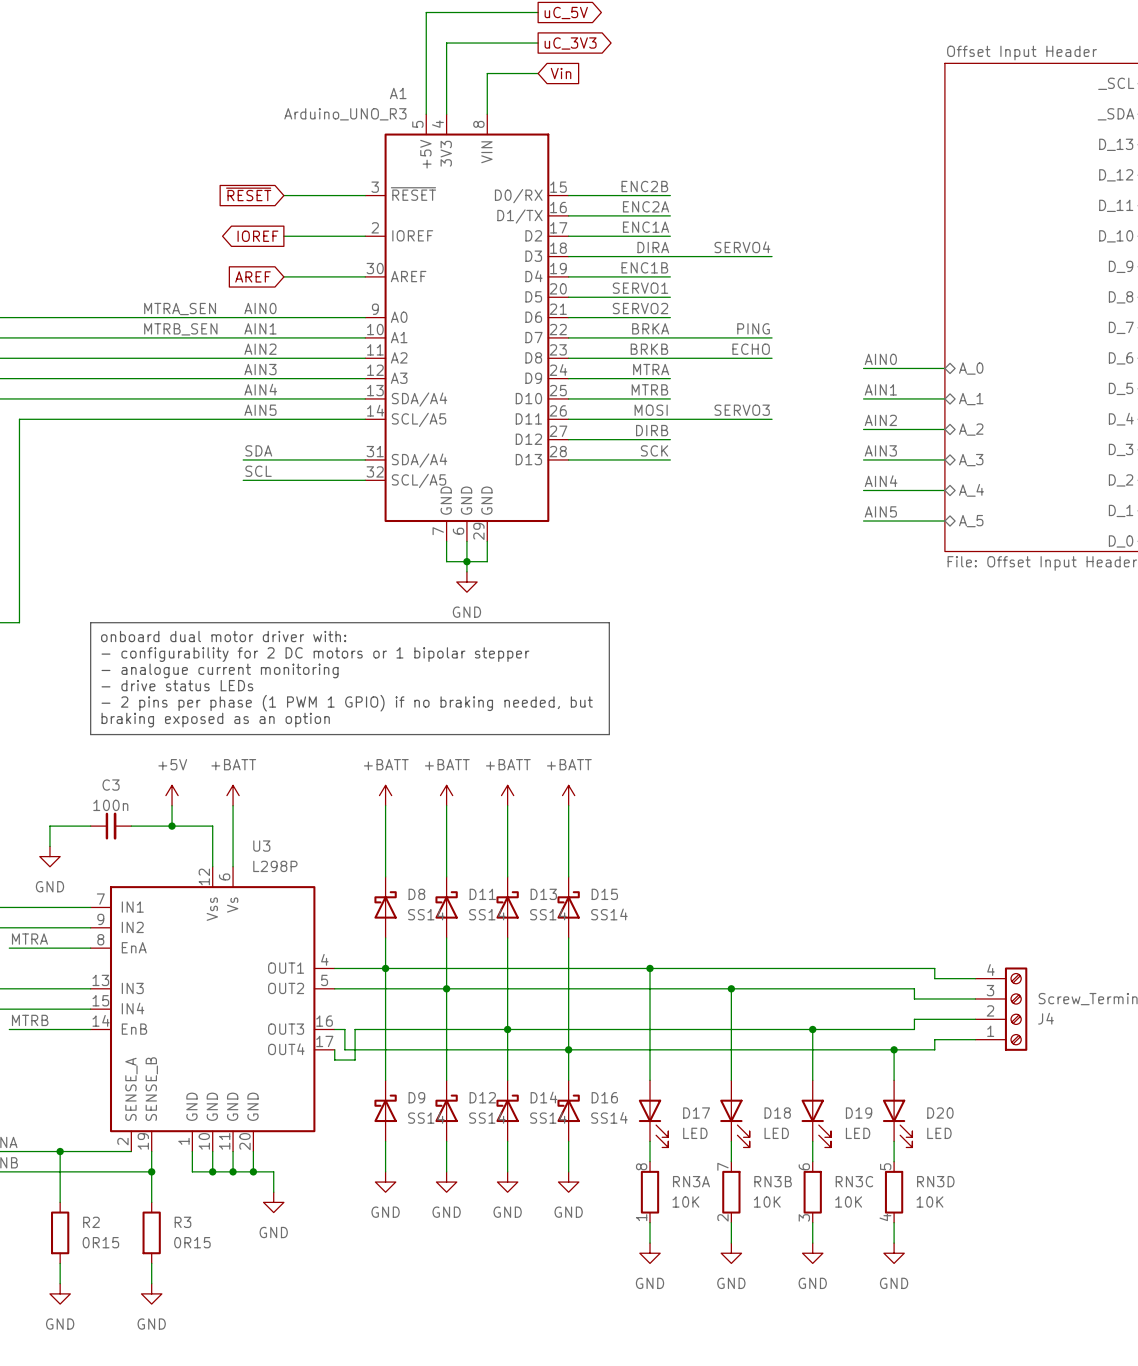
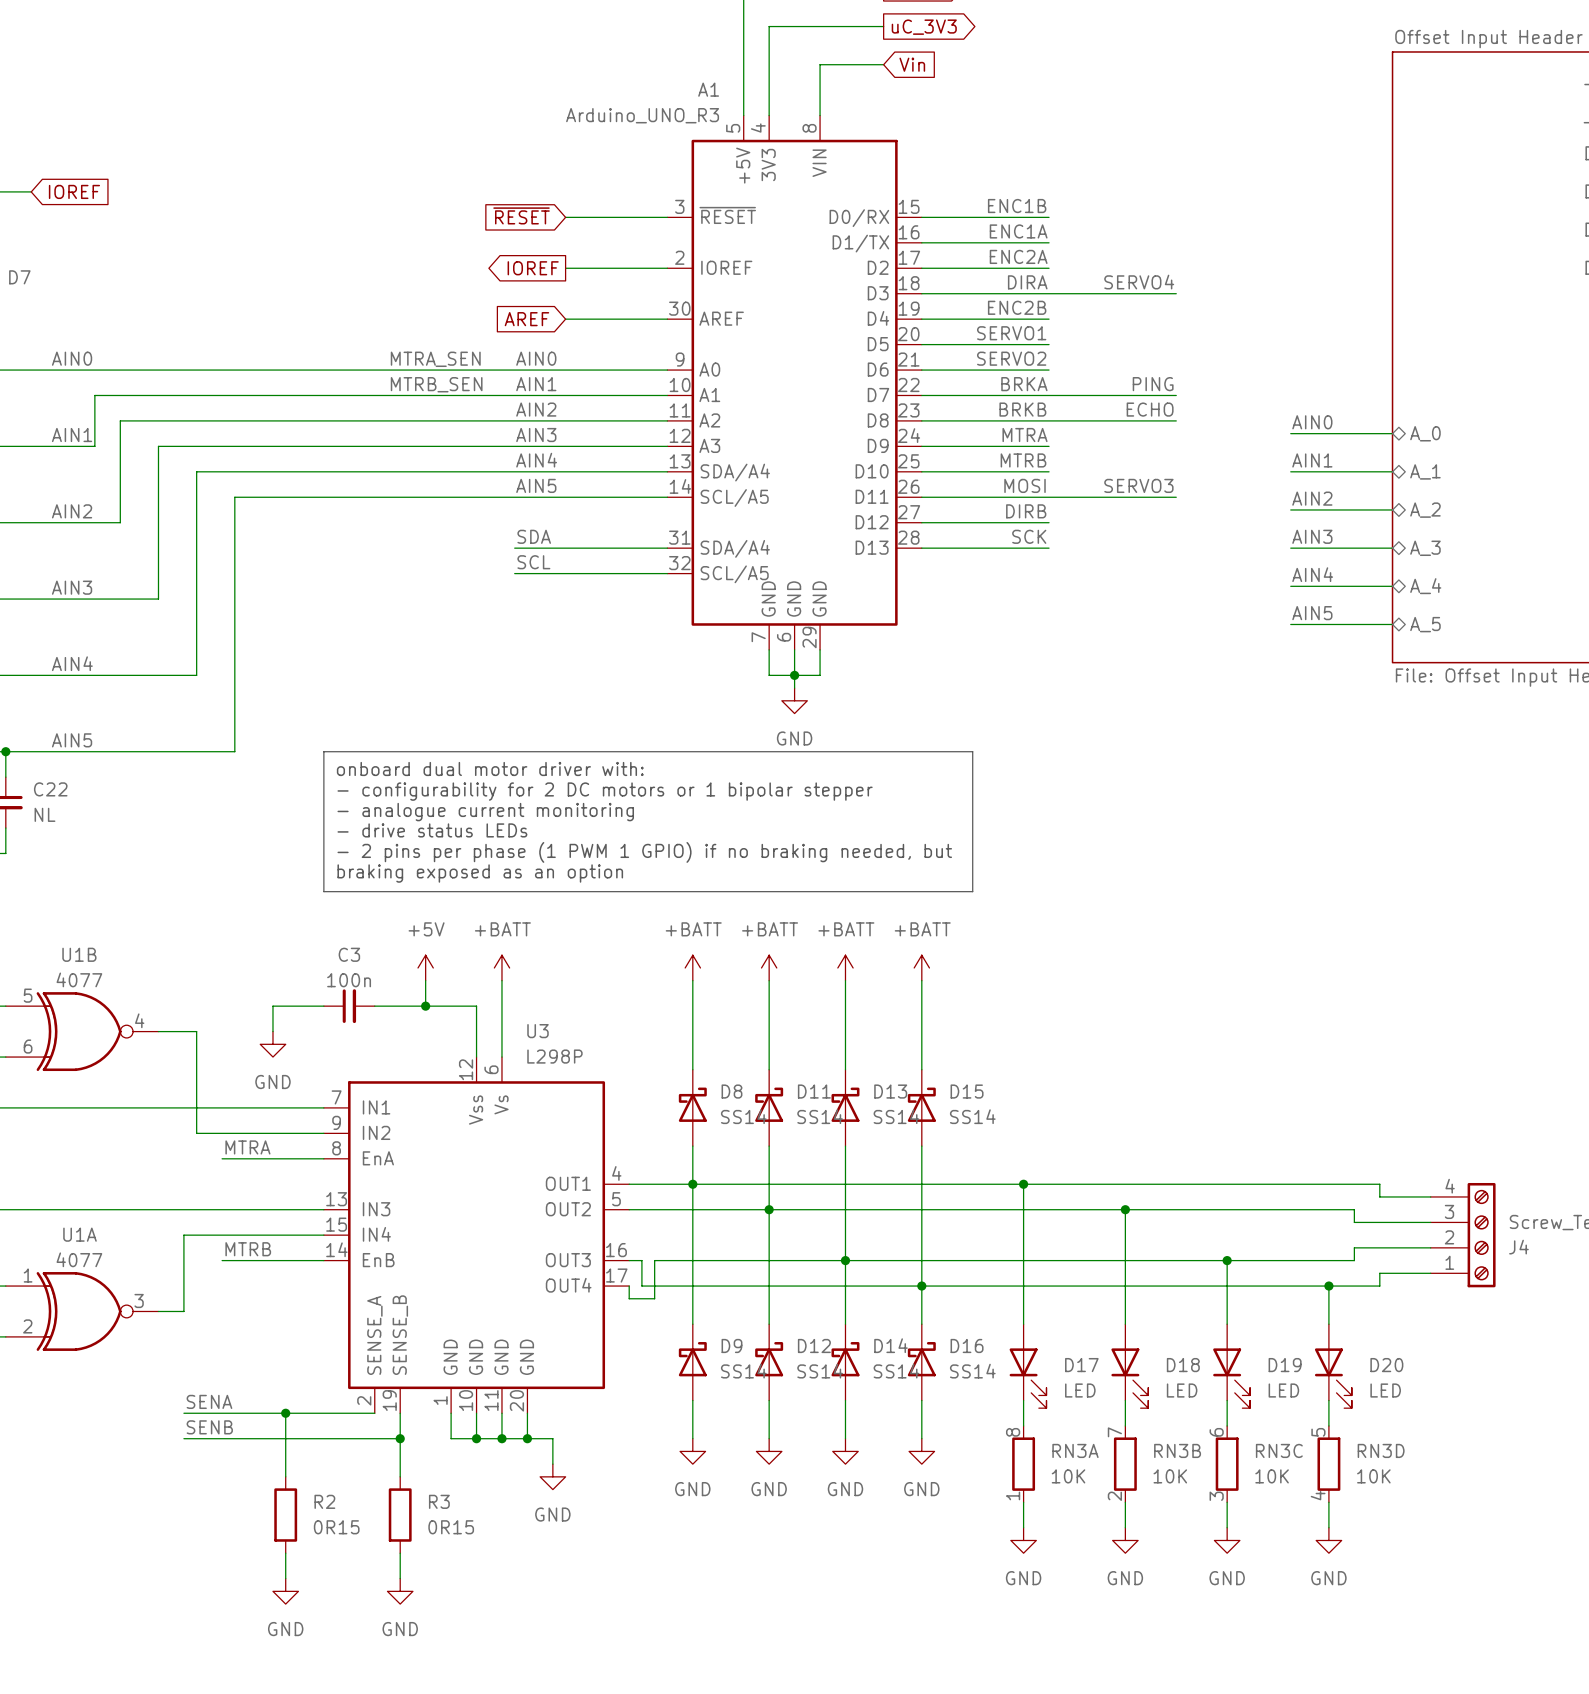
label: ENC2B (644, 186) -> ENC1B (1017, 206)
label: ENC2A (646, 206) -> ENC1A (1018, 231)
label: ENC1A (646, 227) -> ENC2A (1018, 256)
label: ENC1B (644, 267) -> ENC2B (1017, 307)

